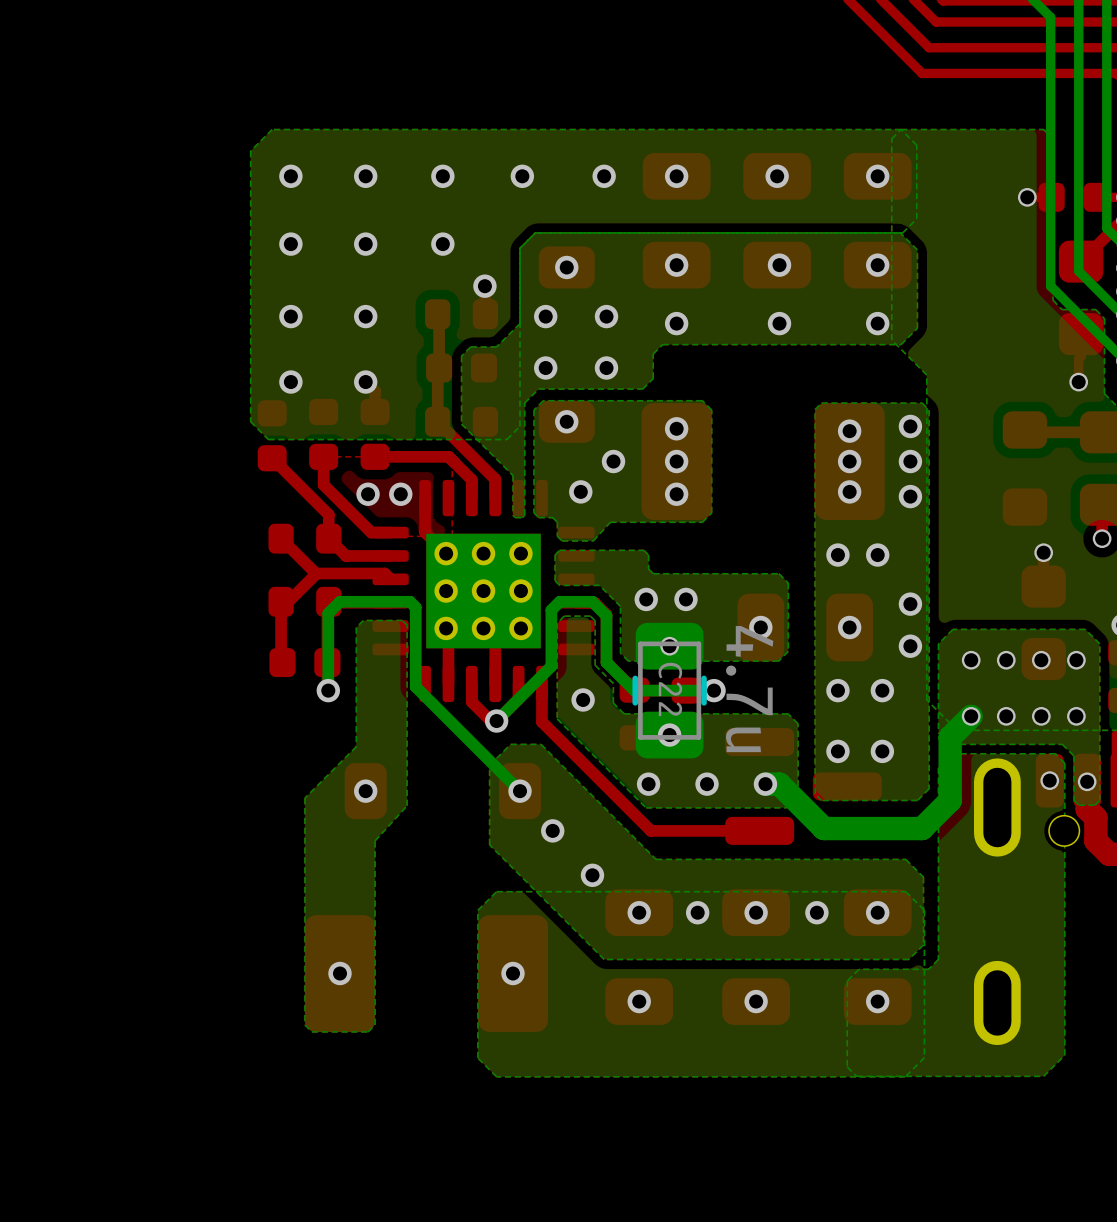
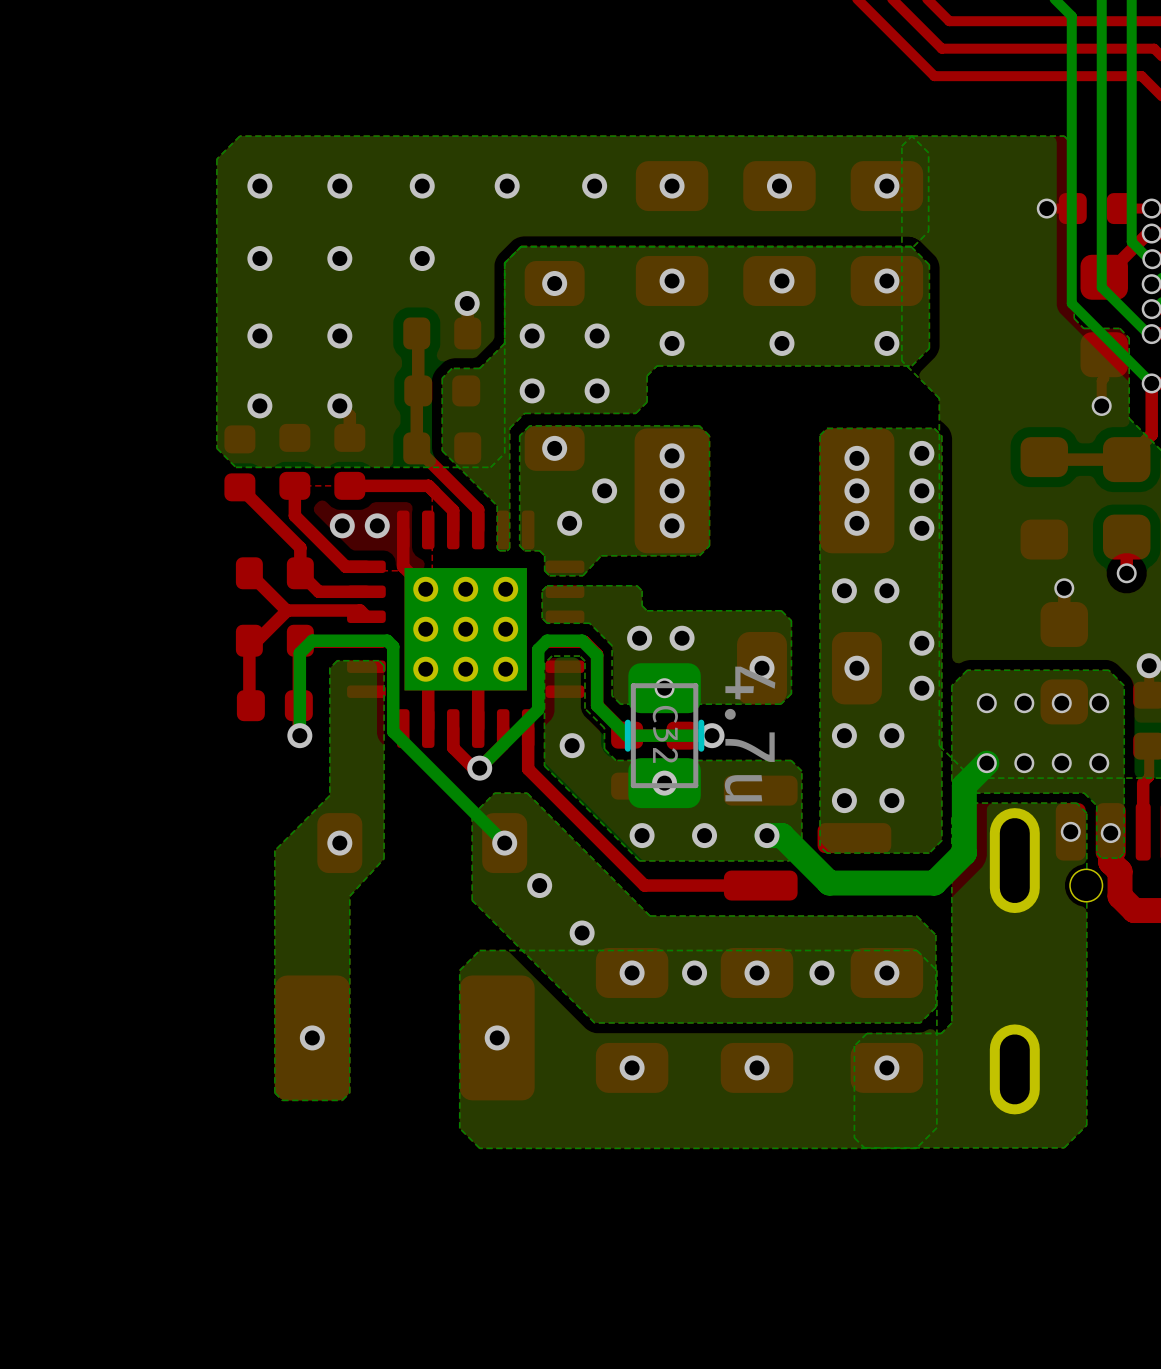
C22 name: C22 (670, 689) -> C32 (665, 734)

